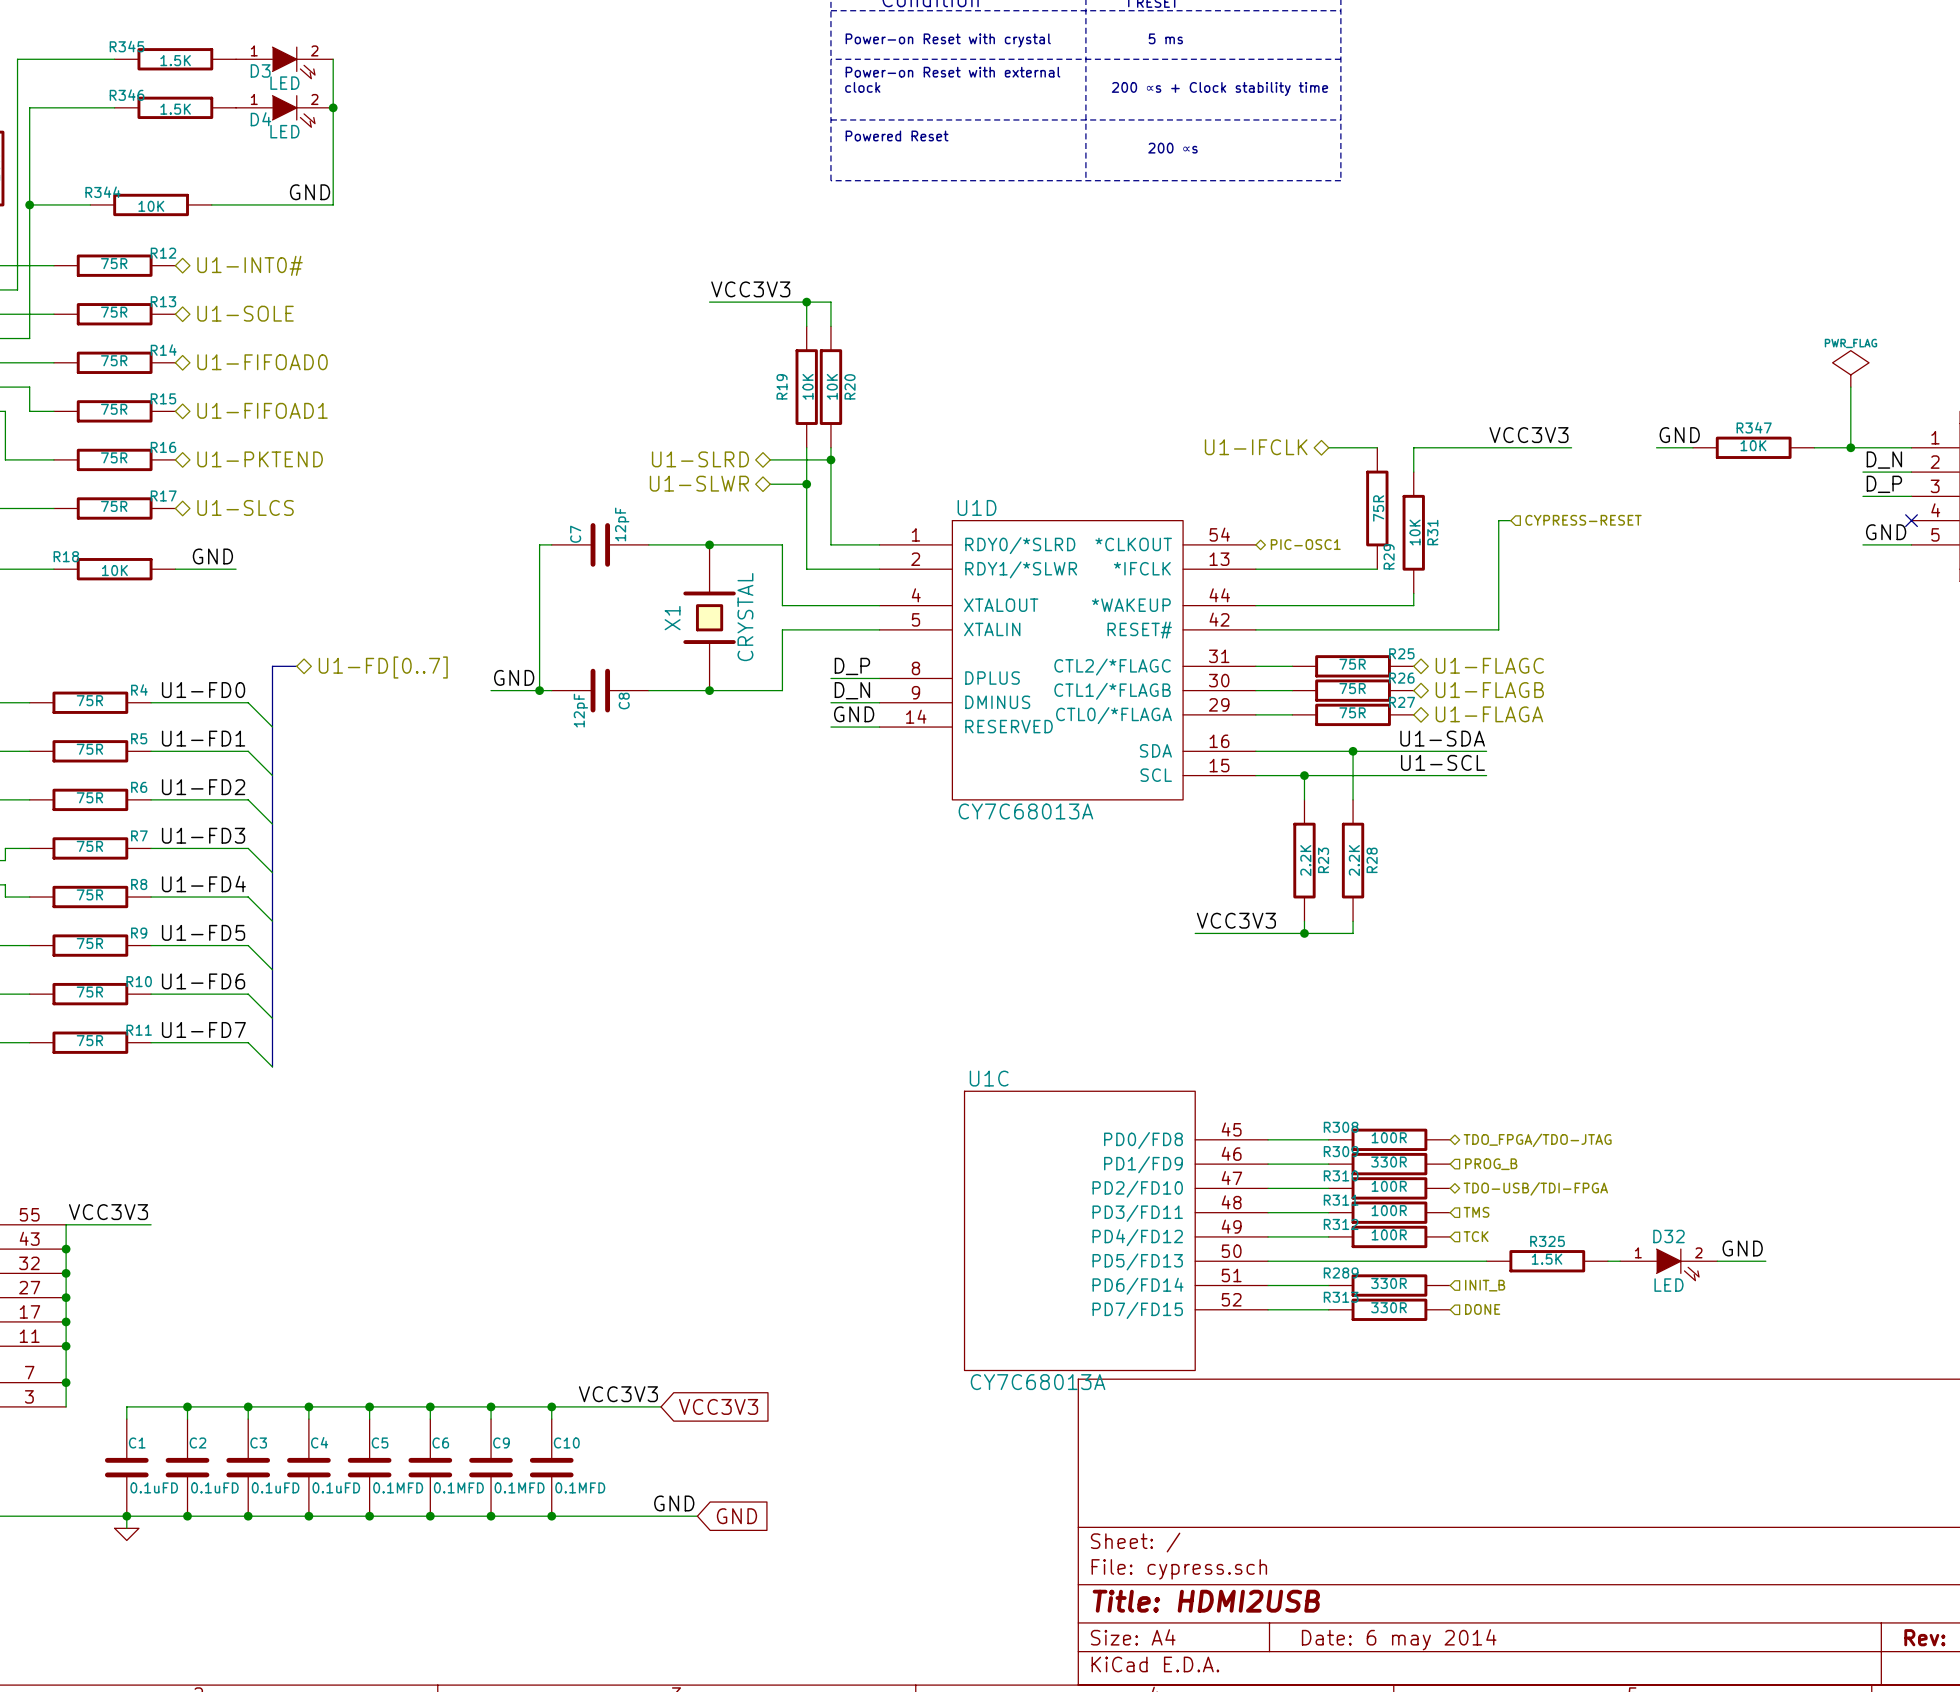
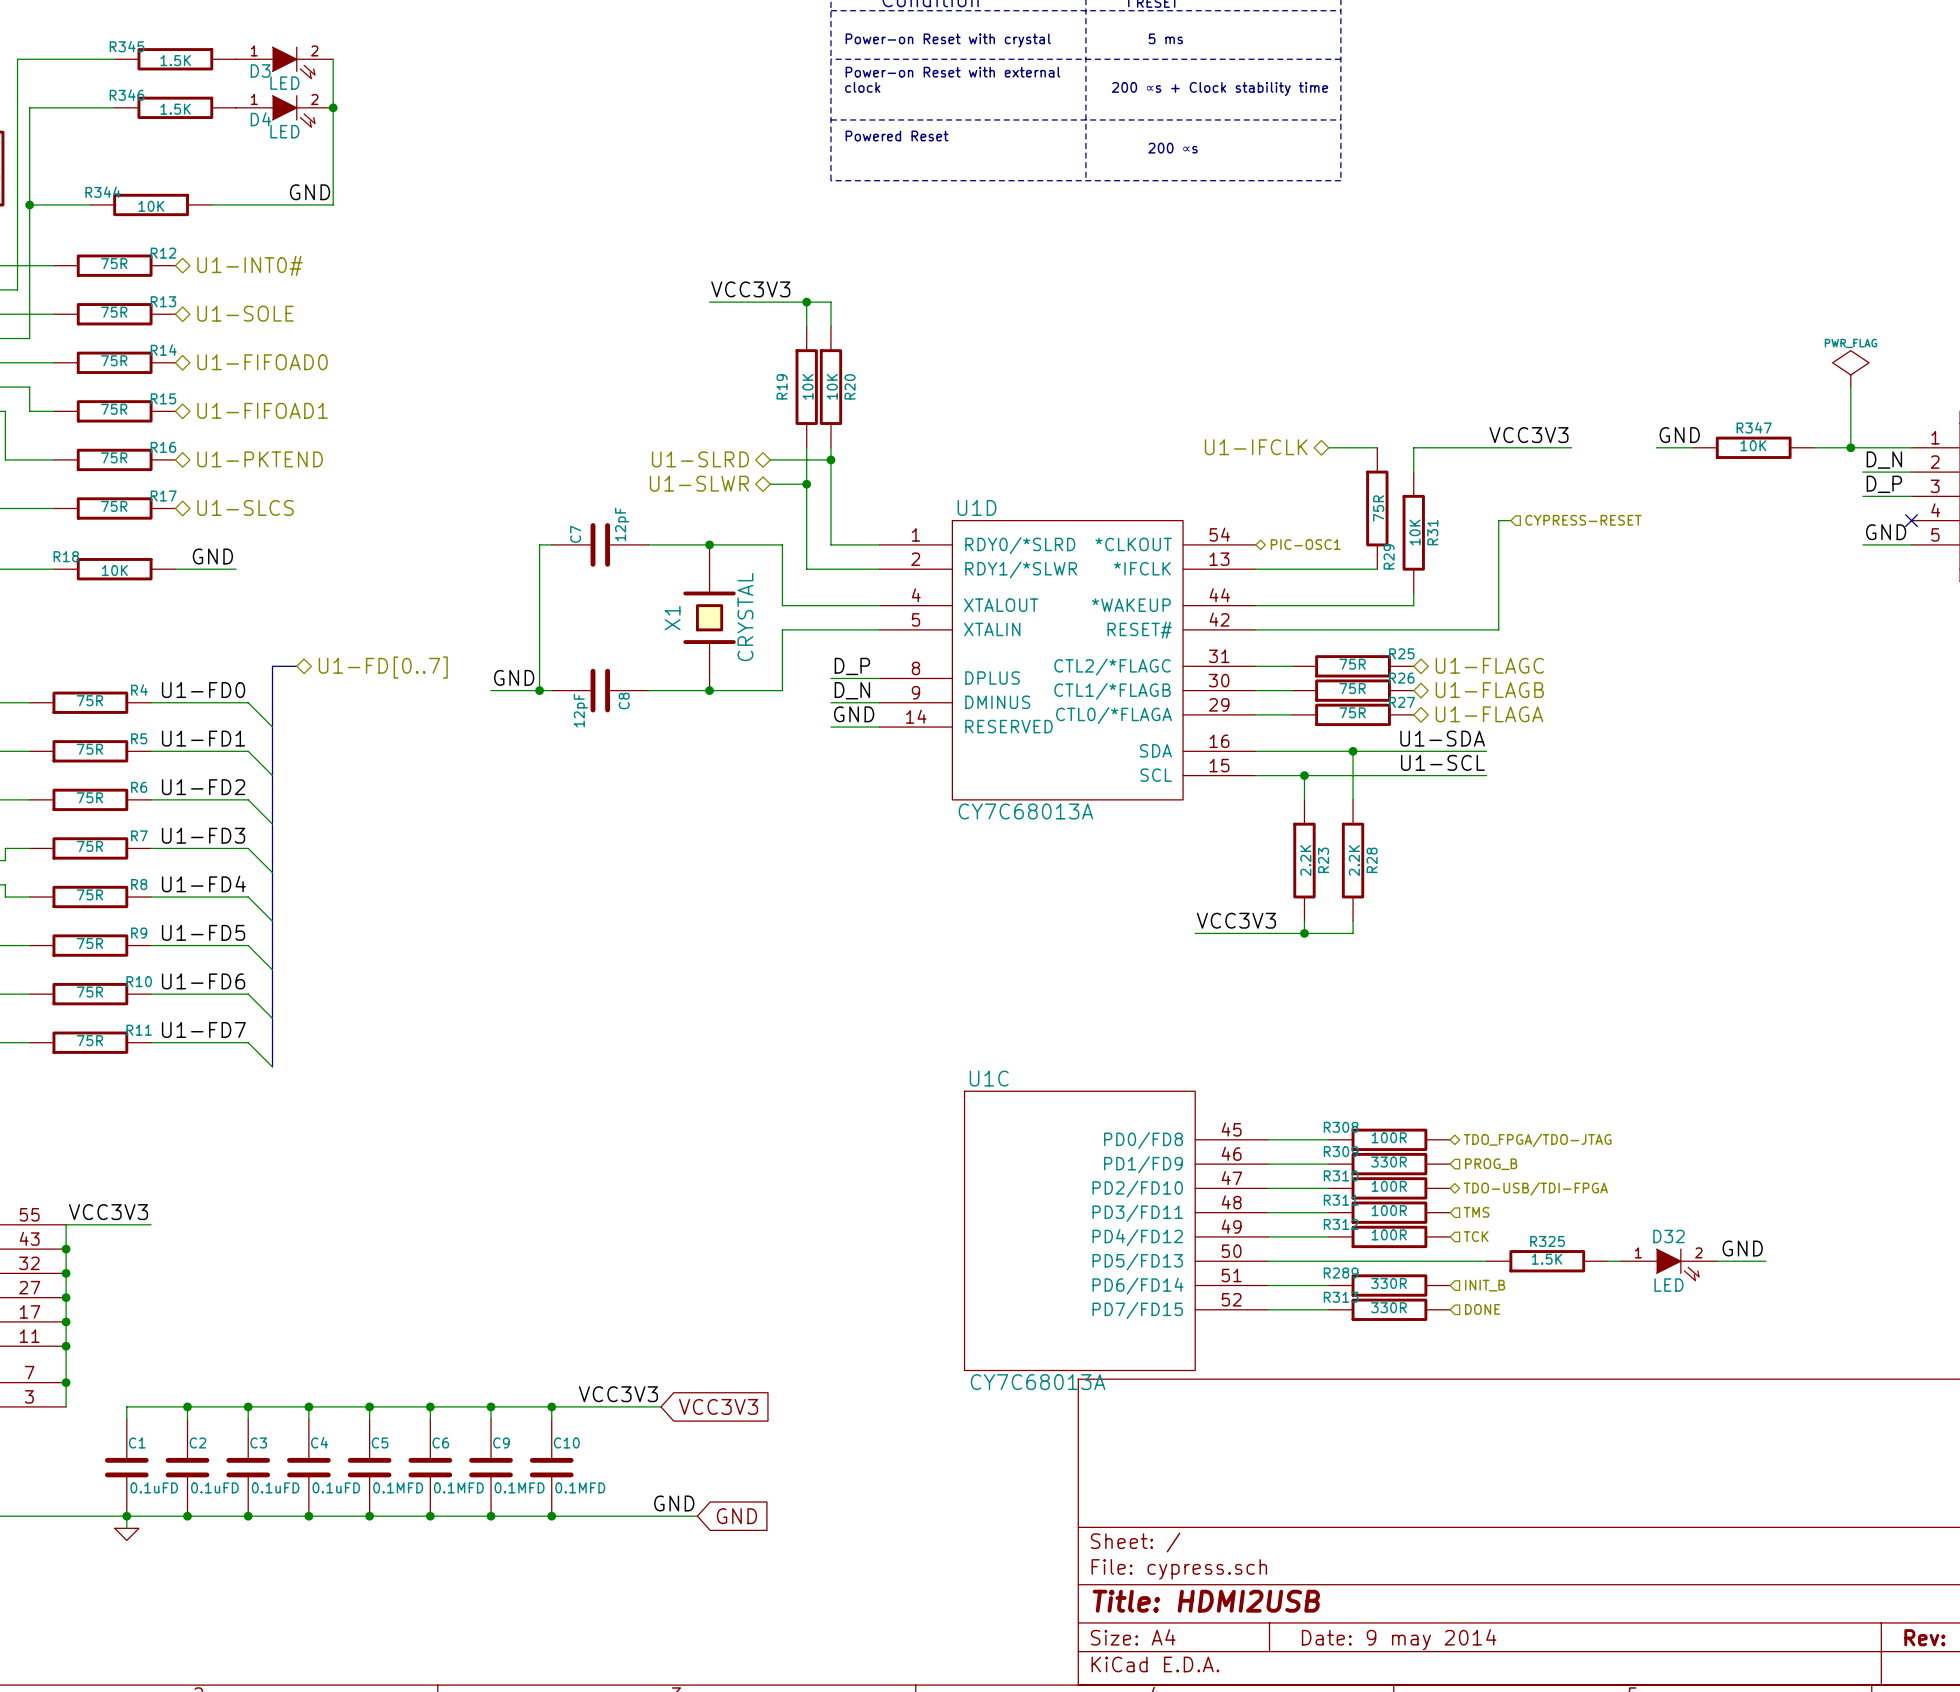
title block: Date: 6 may 2014 (1399, 1639) -> Date: 9 may 2014 (1399, 1639)

